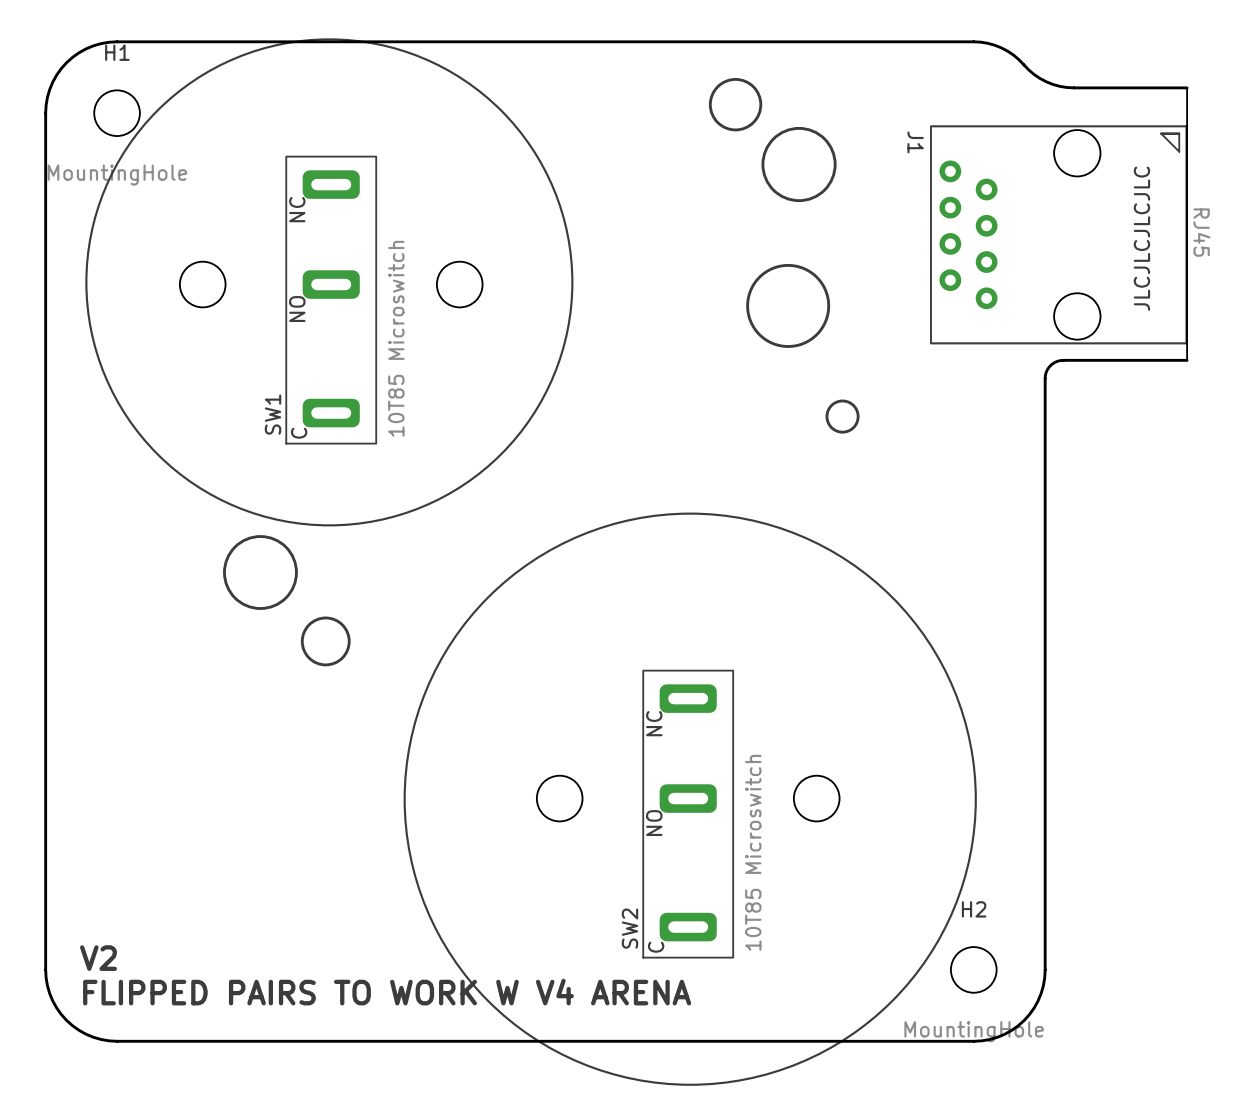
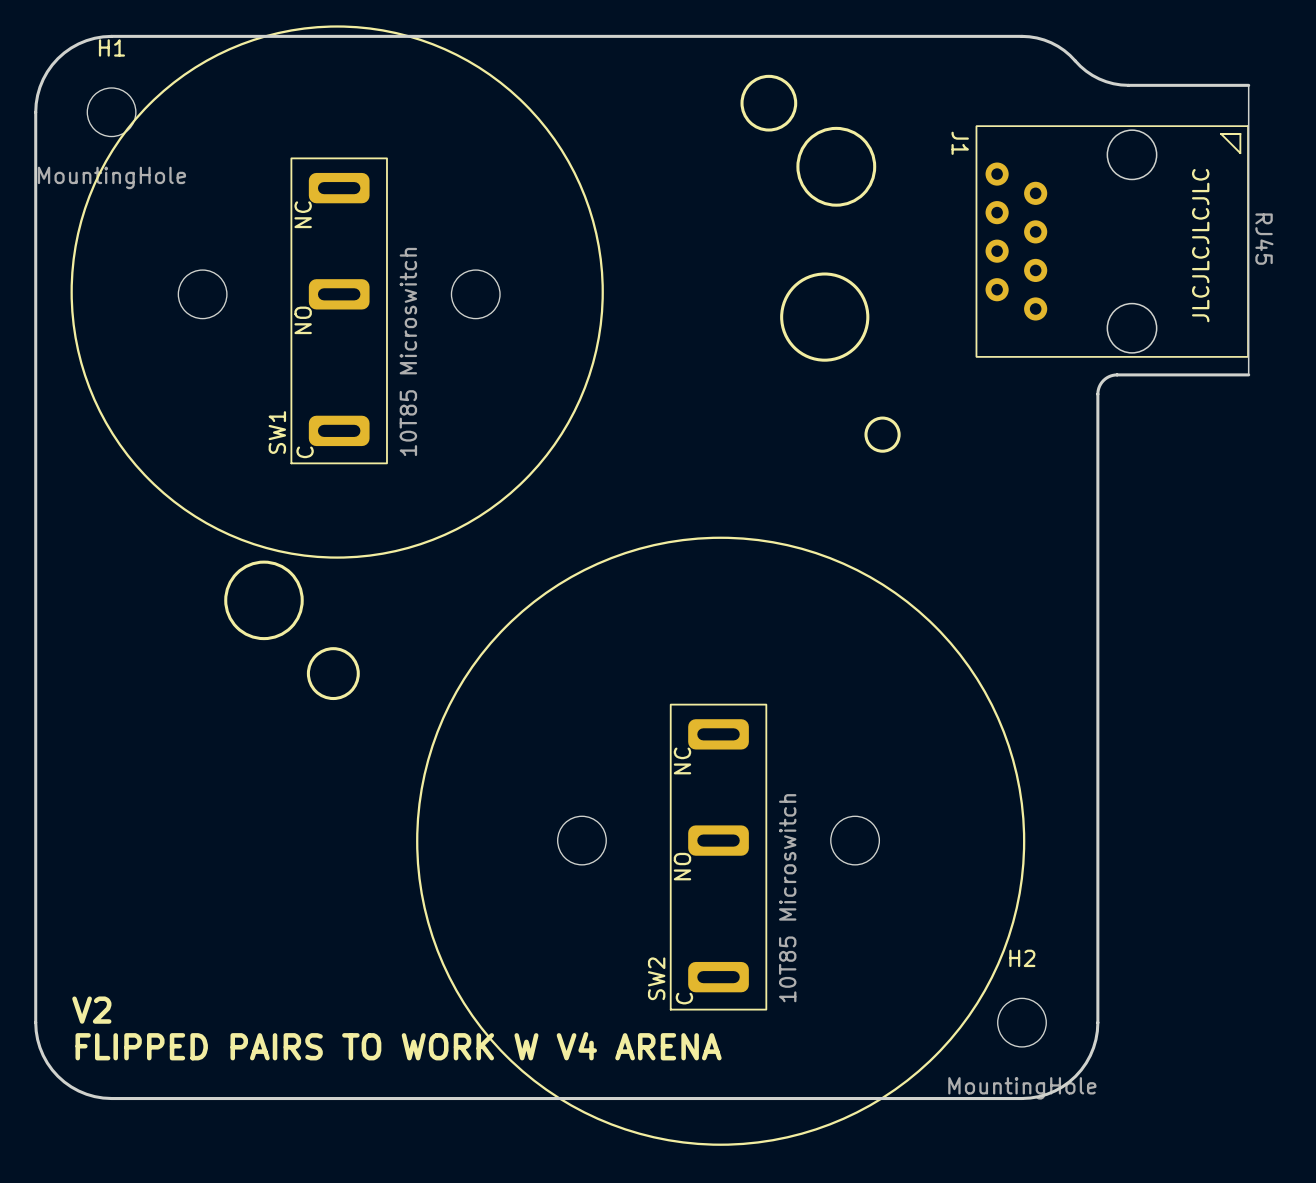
drawing shape: [85, 38, 574, 527] -> [70, 25, 604, 559]

